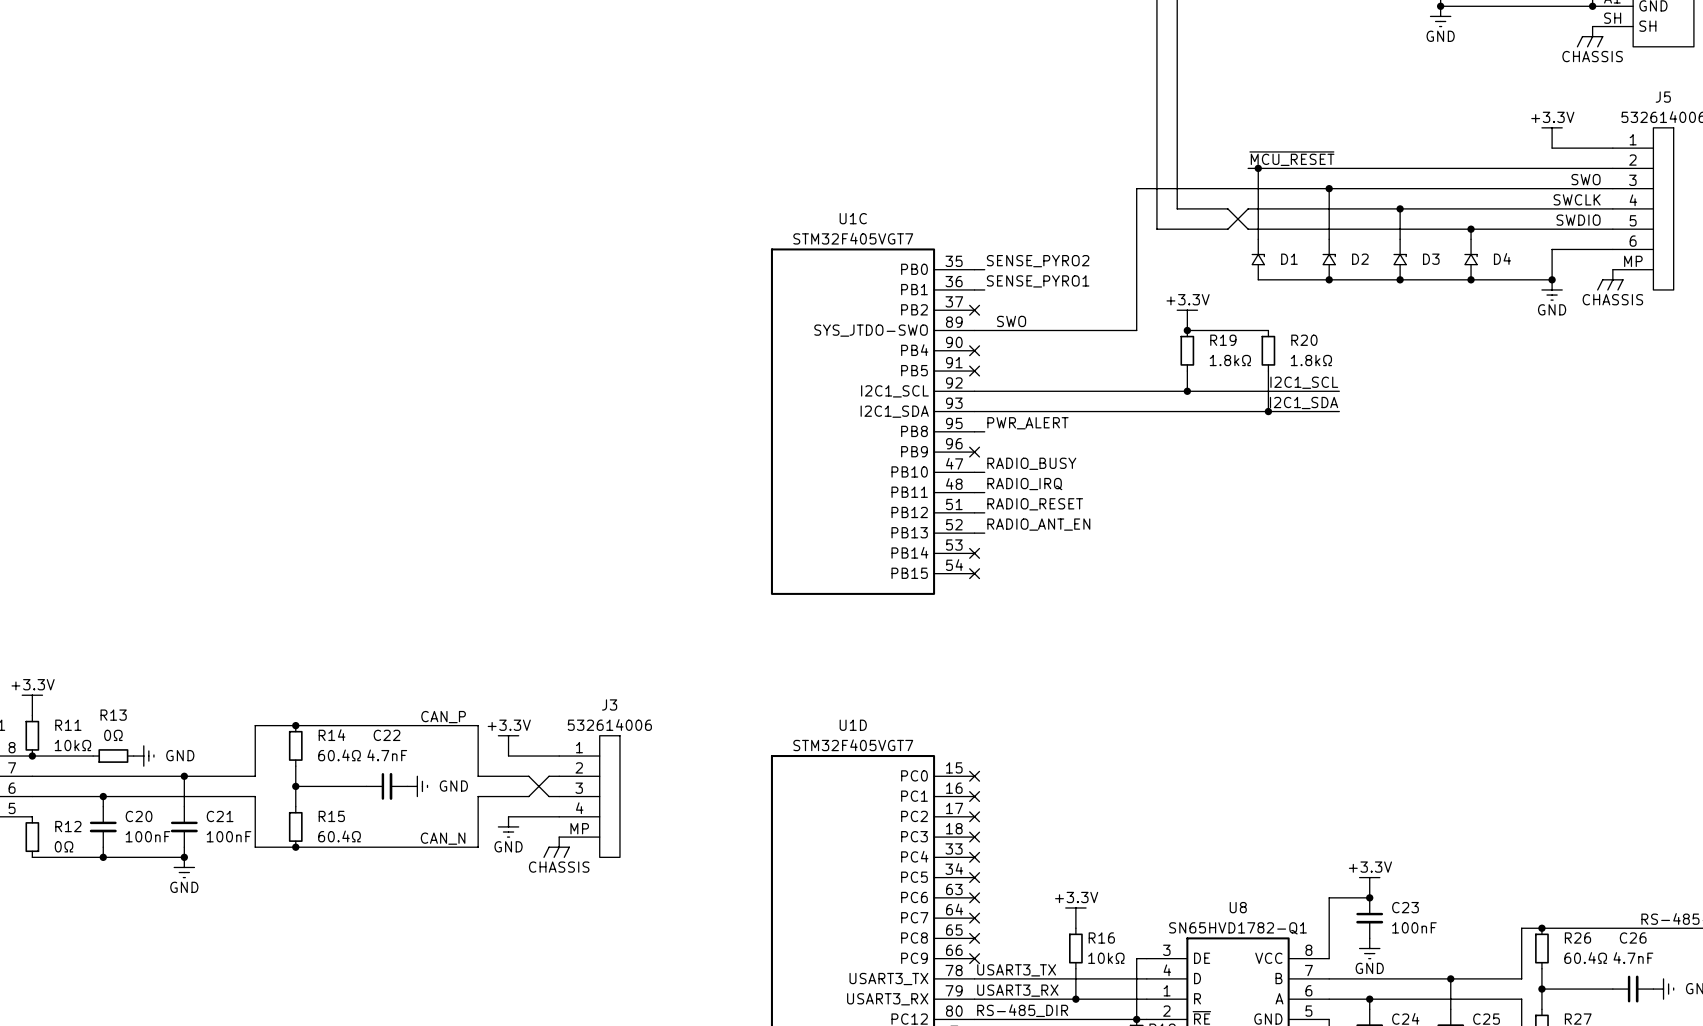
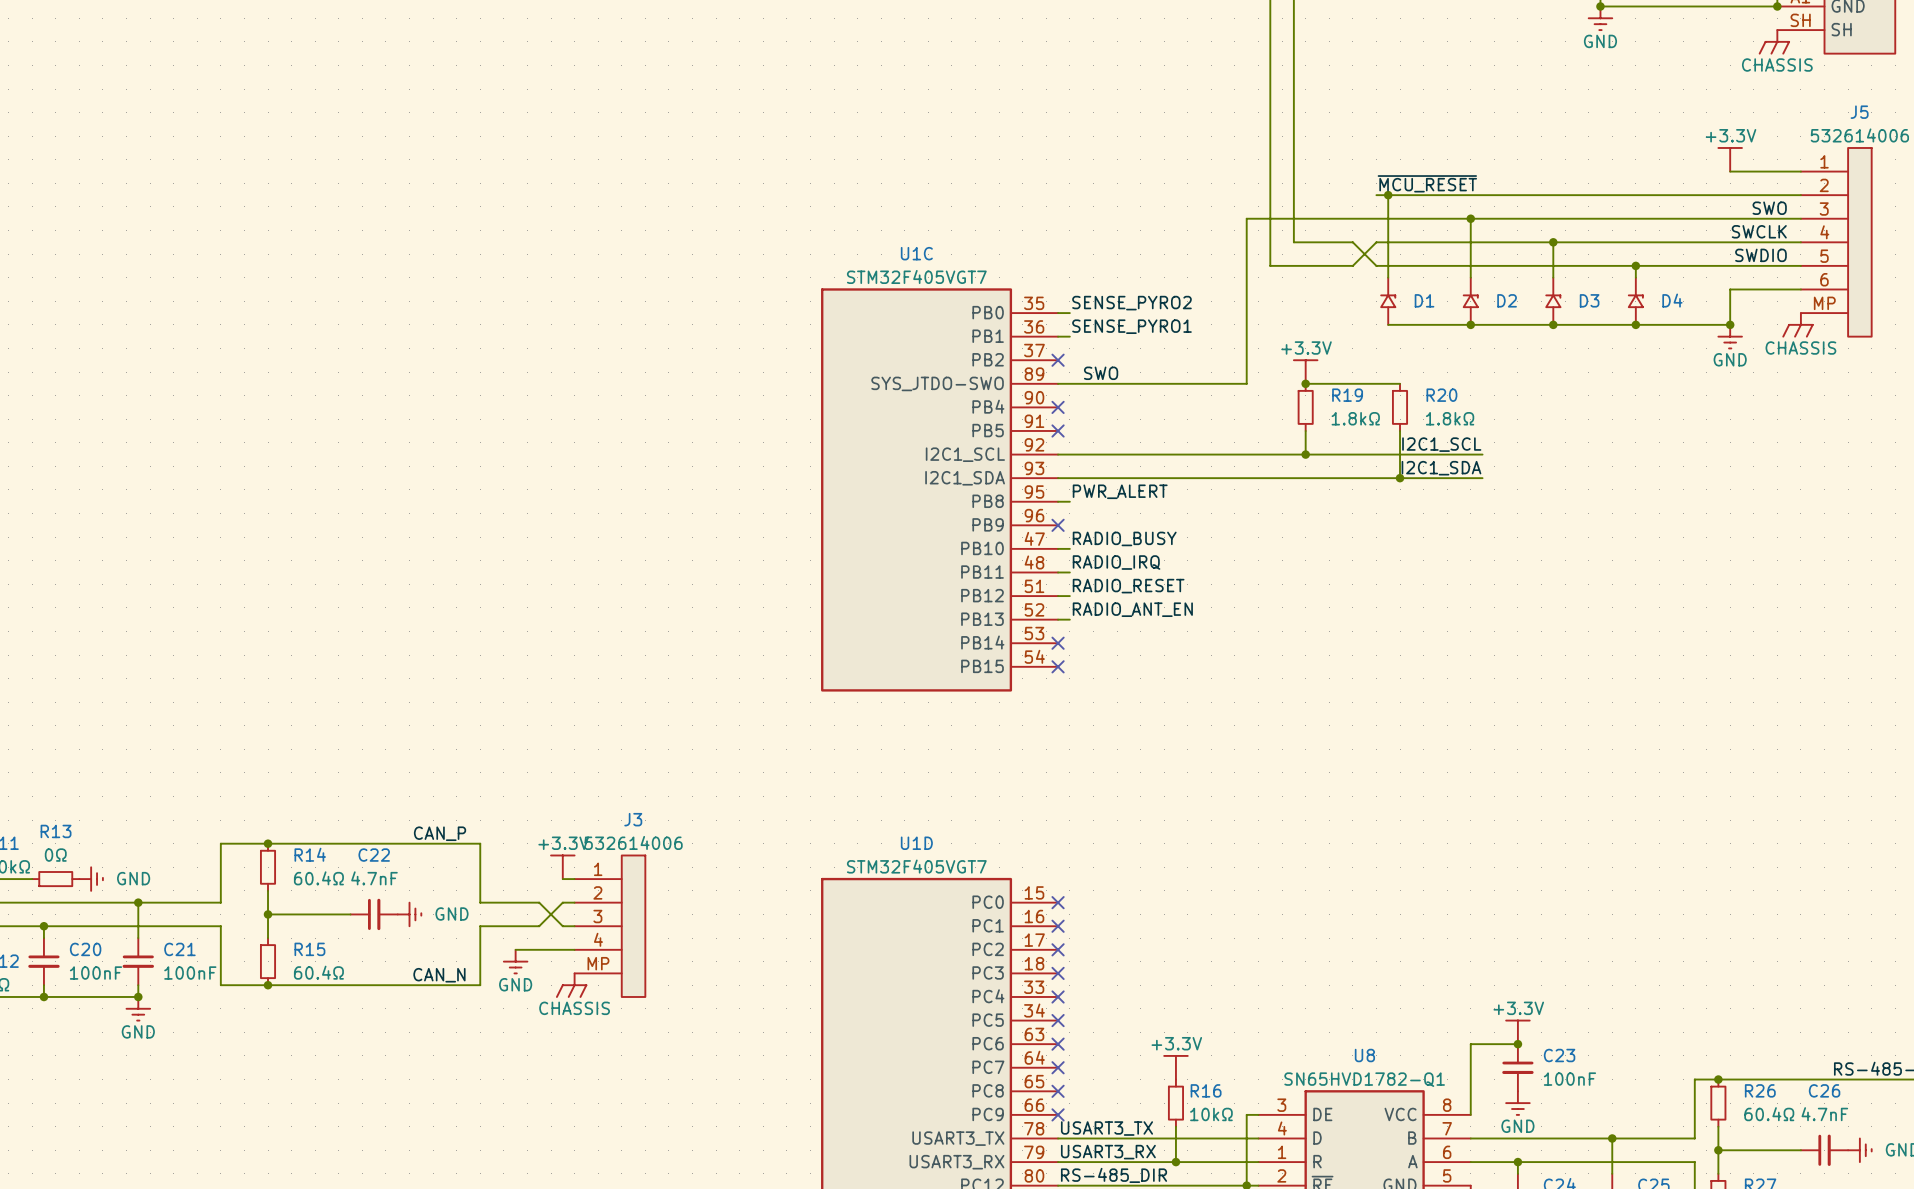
power symbol position: +3.3V (508, 745) -> +3.3V (562, 867)
wire: (508, 756) (549, 756) -> none

